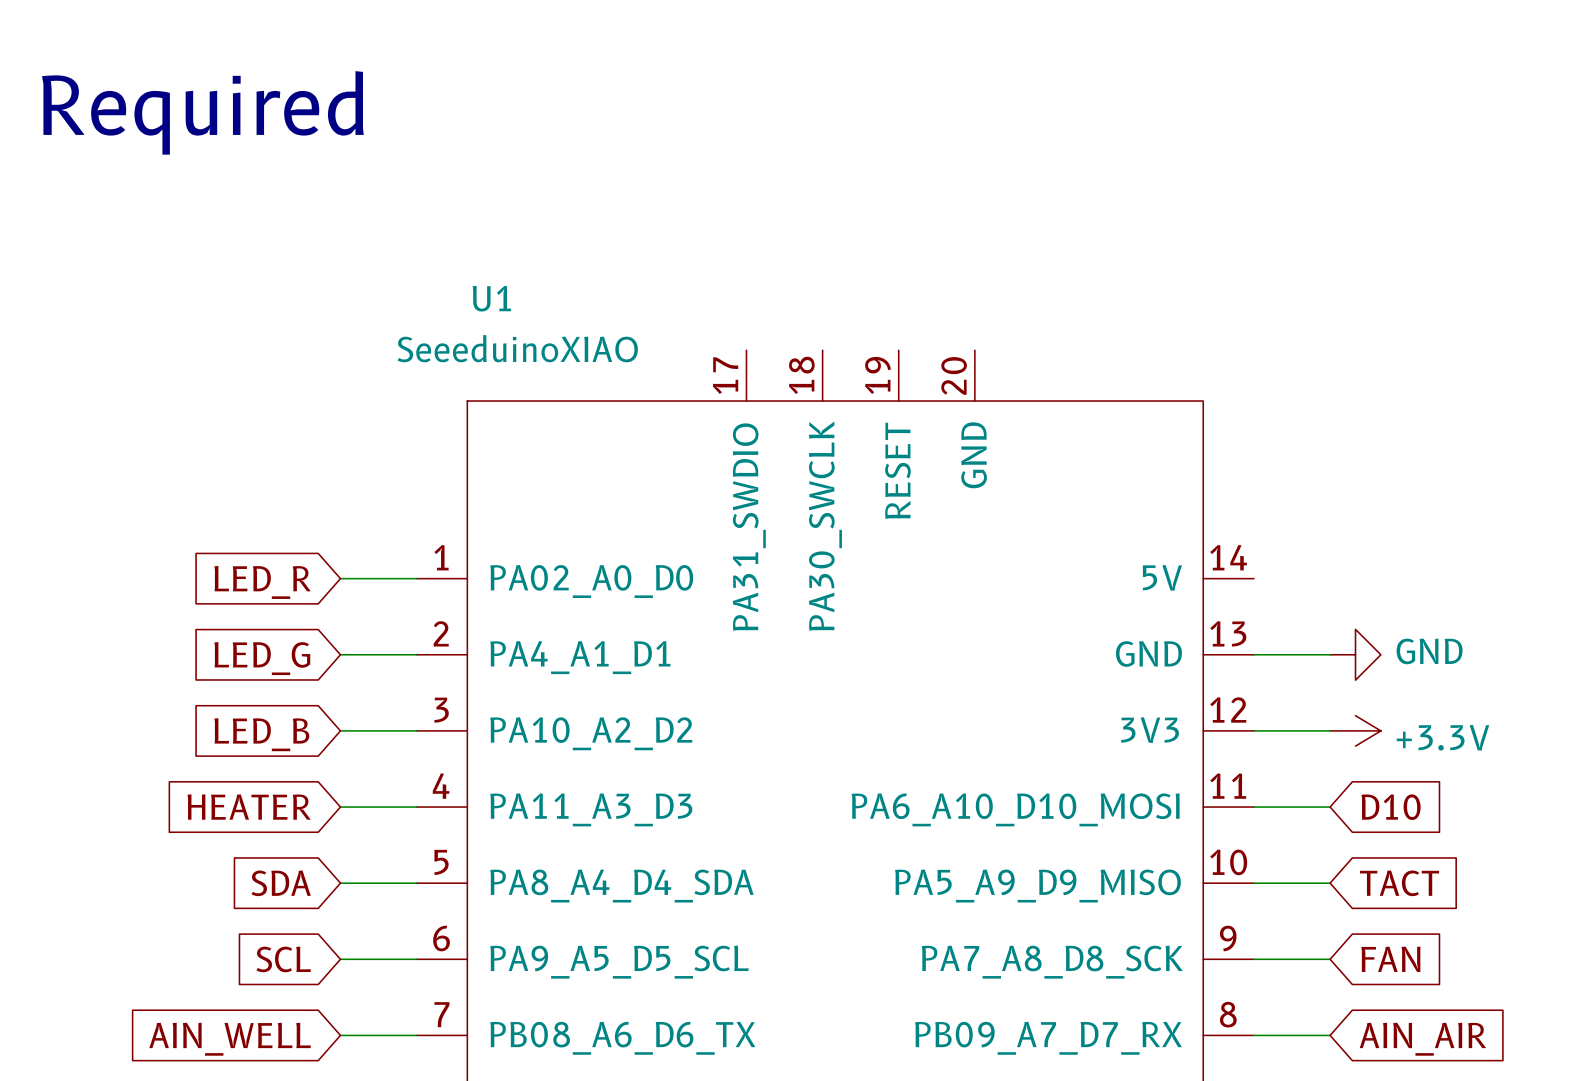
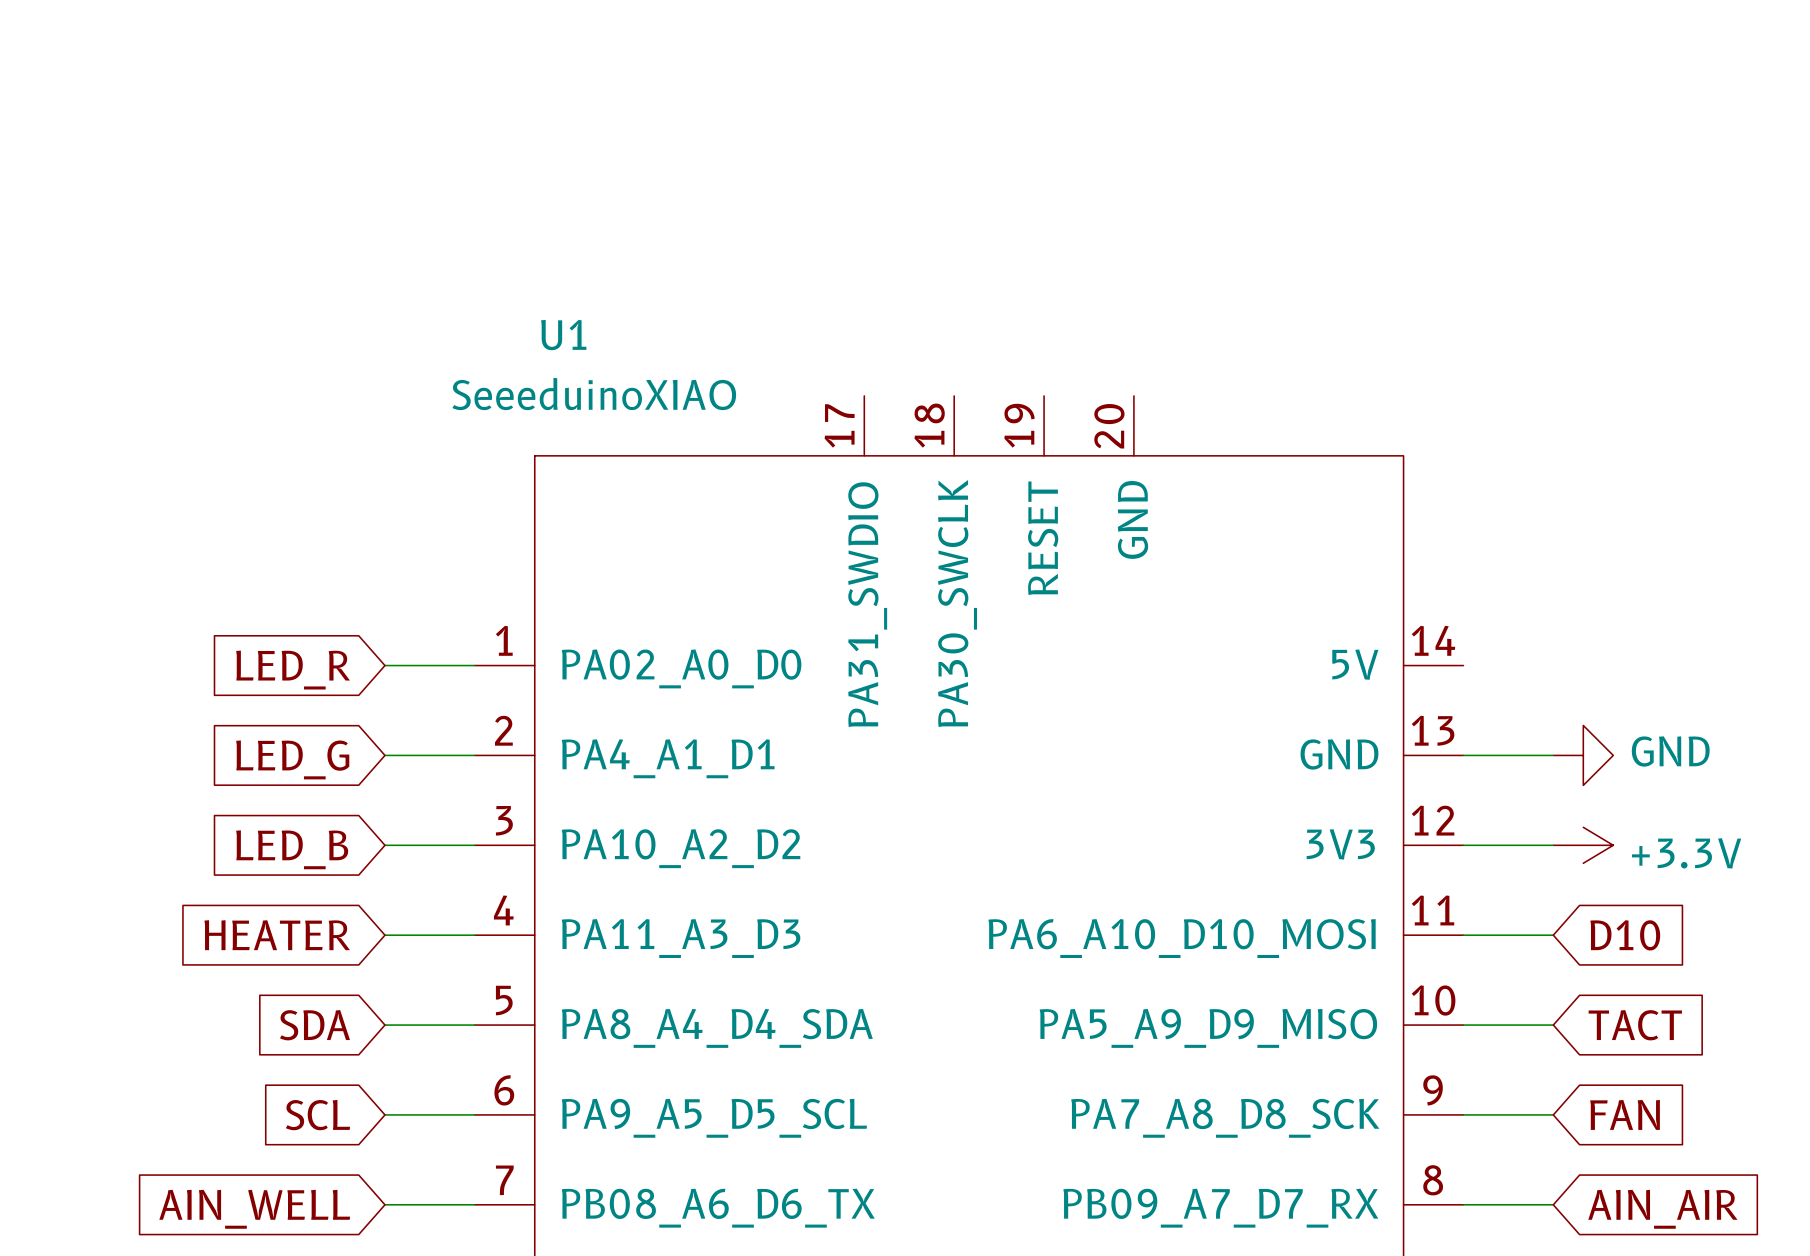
text: Required (202, 112) -> none

